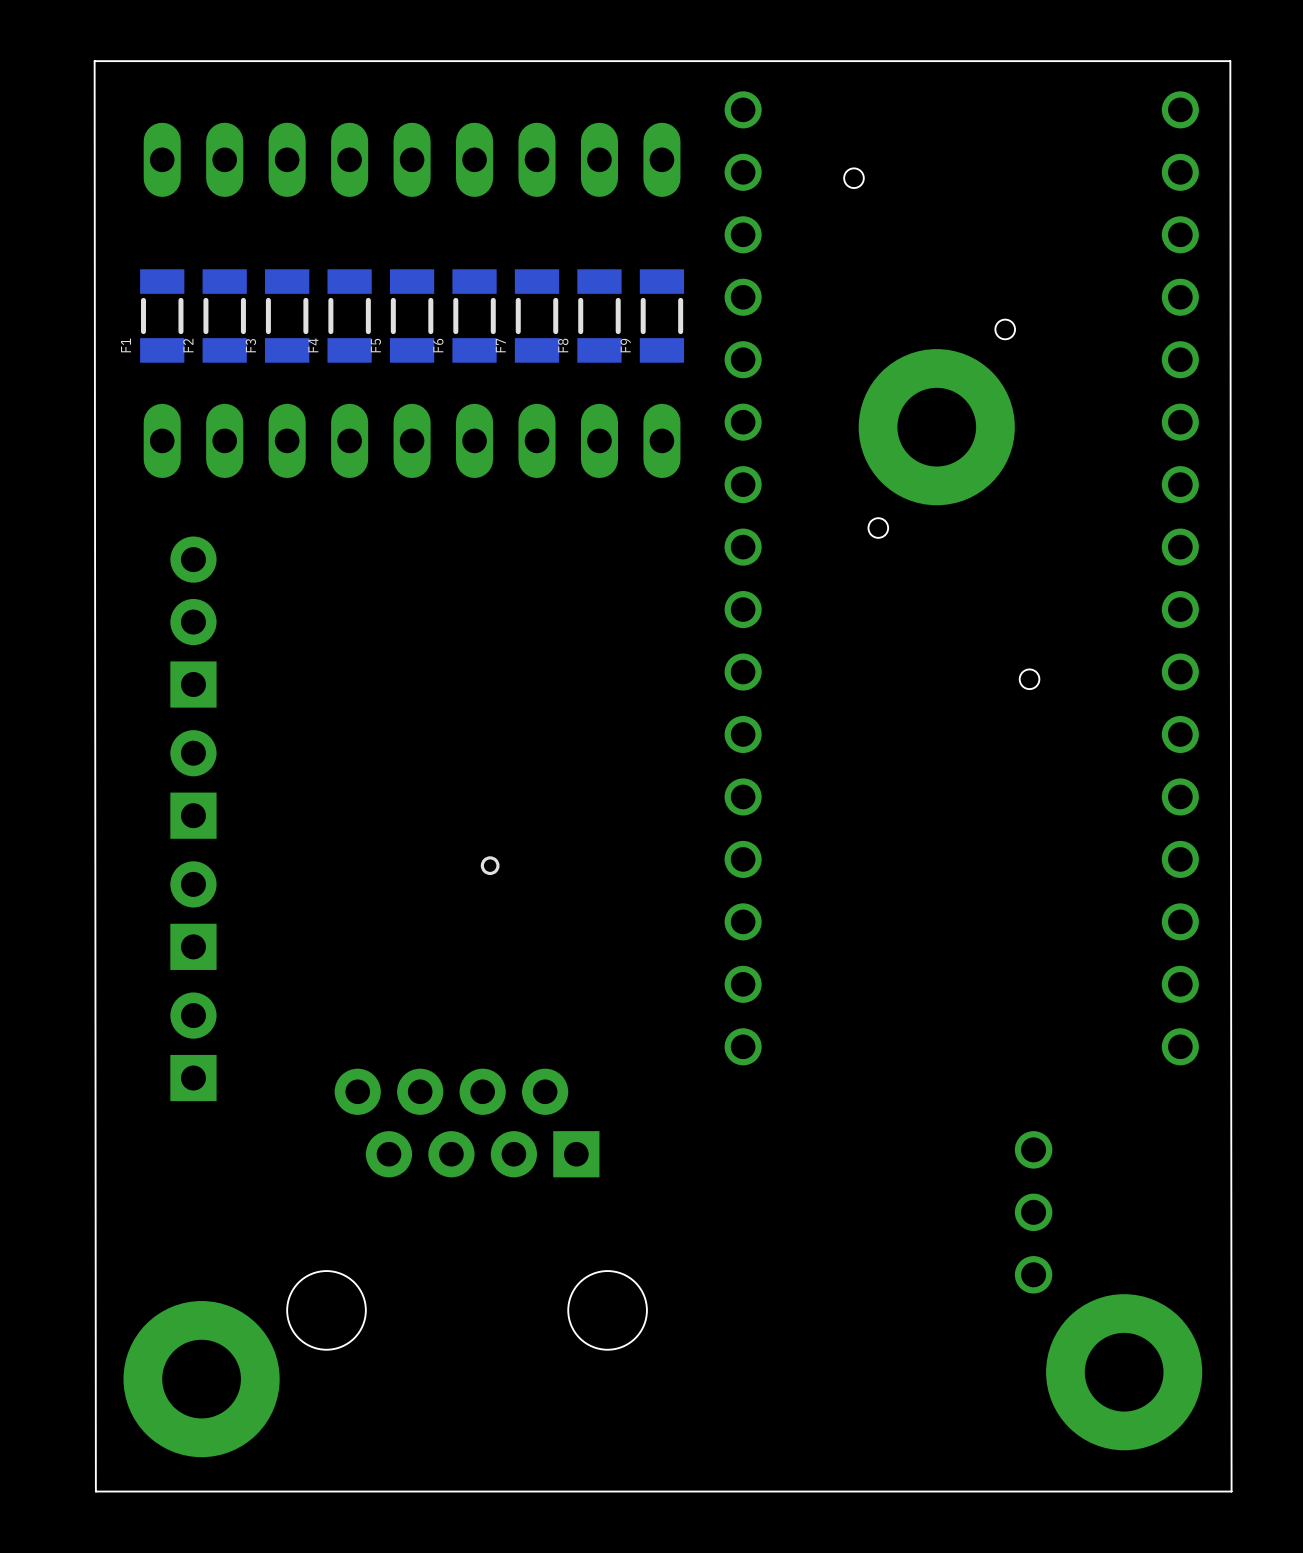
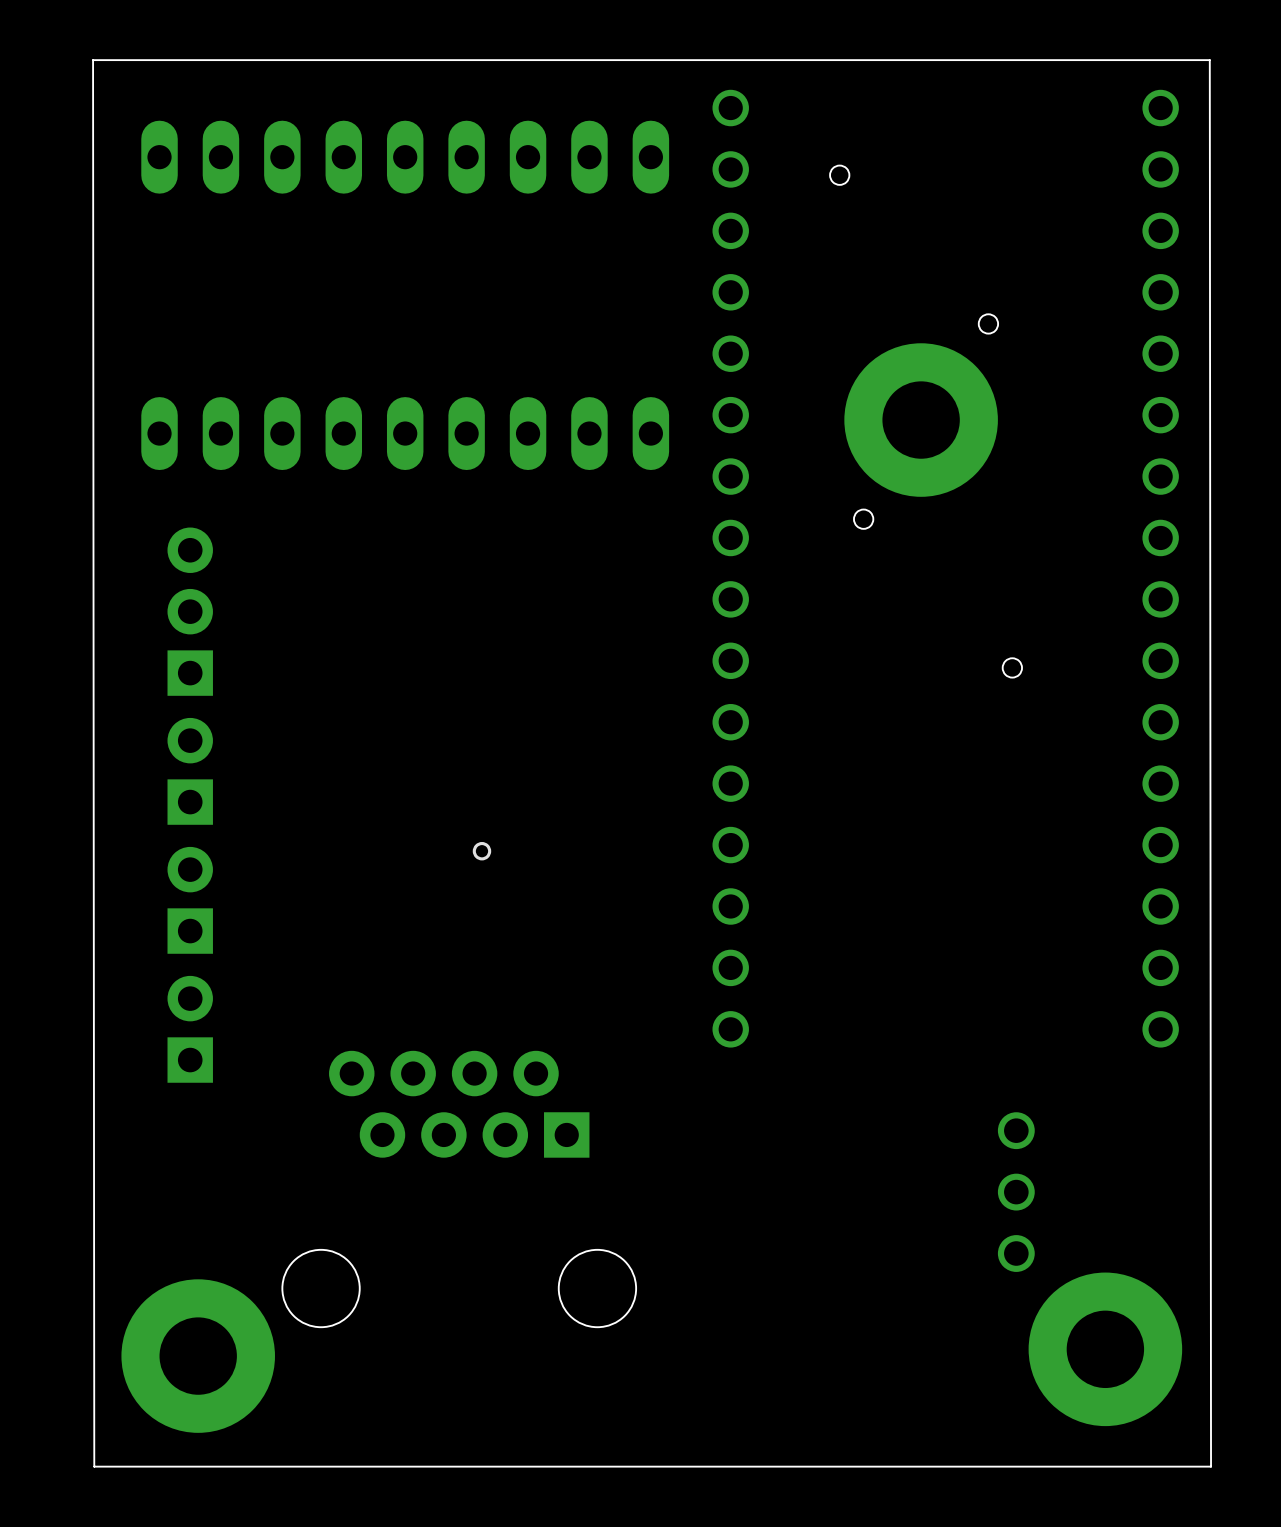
F1: (162, 315) -> none
F2: (224, 315) -> none
F3: (287, 315) -> none
F4: (349, 315) -> none
F5: (412, 315) -> none
F6: (474, 315) -> none
F7: (537, 315) -> none
F8: (599, 315) -> none
F9: (661, 315) -> none

